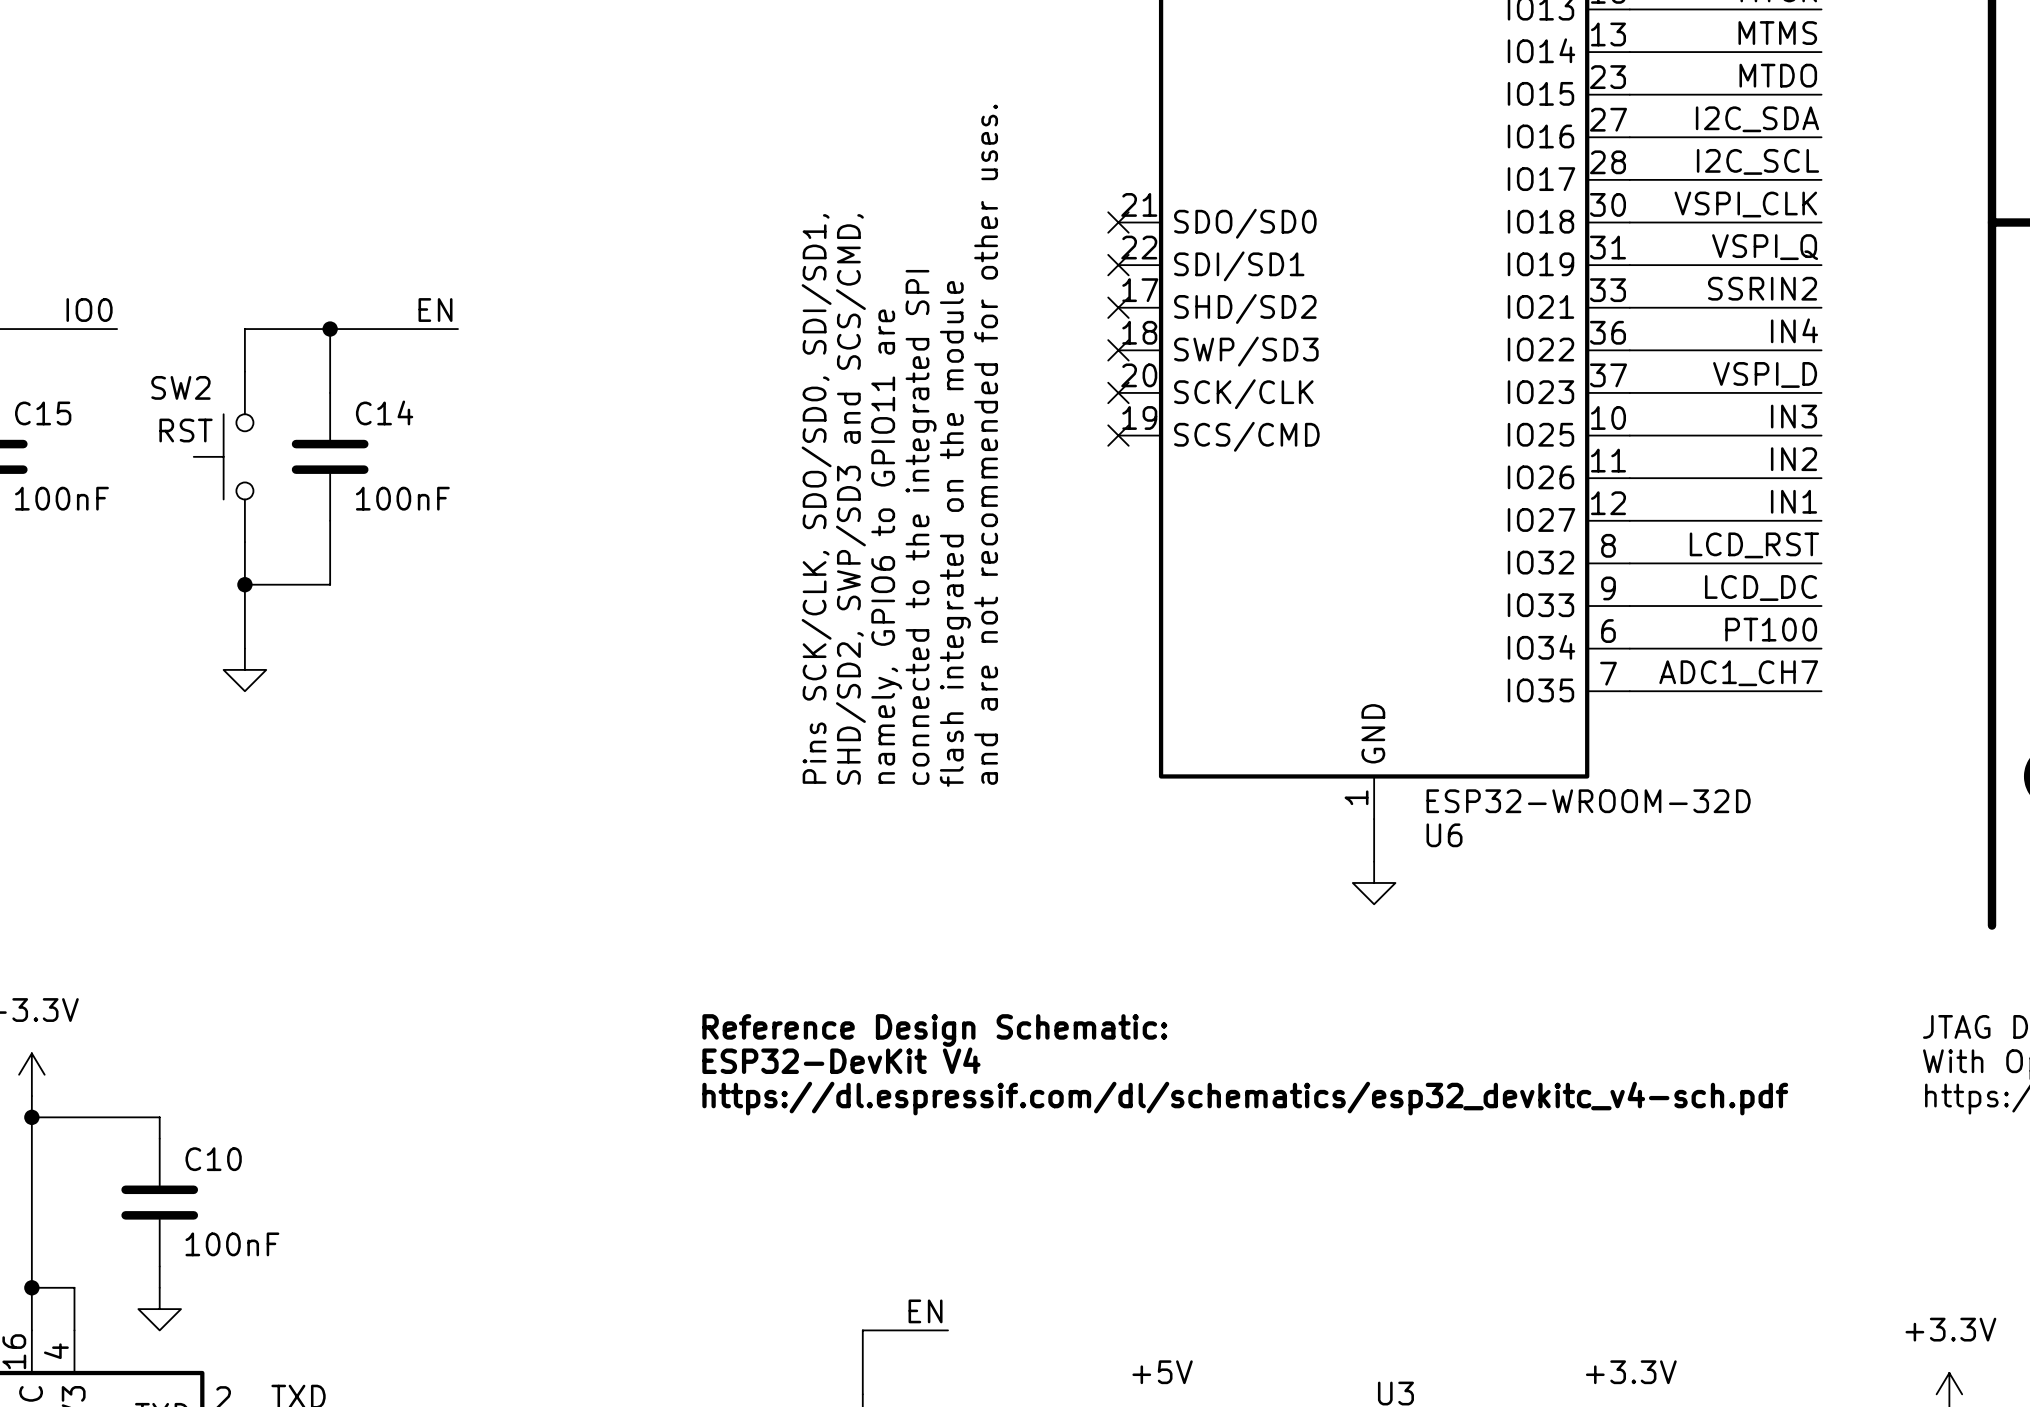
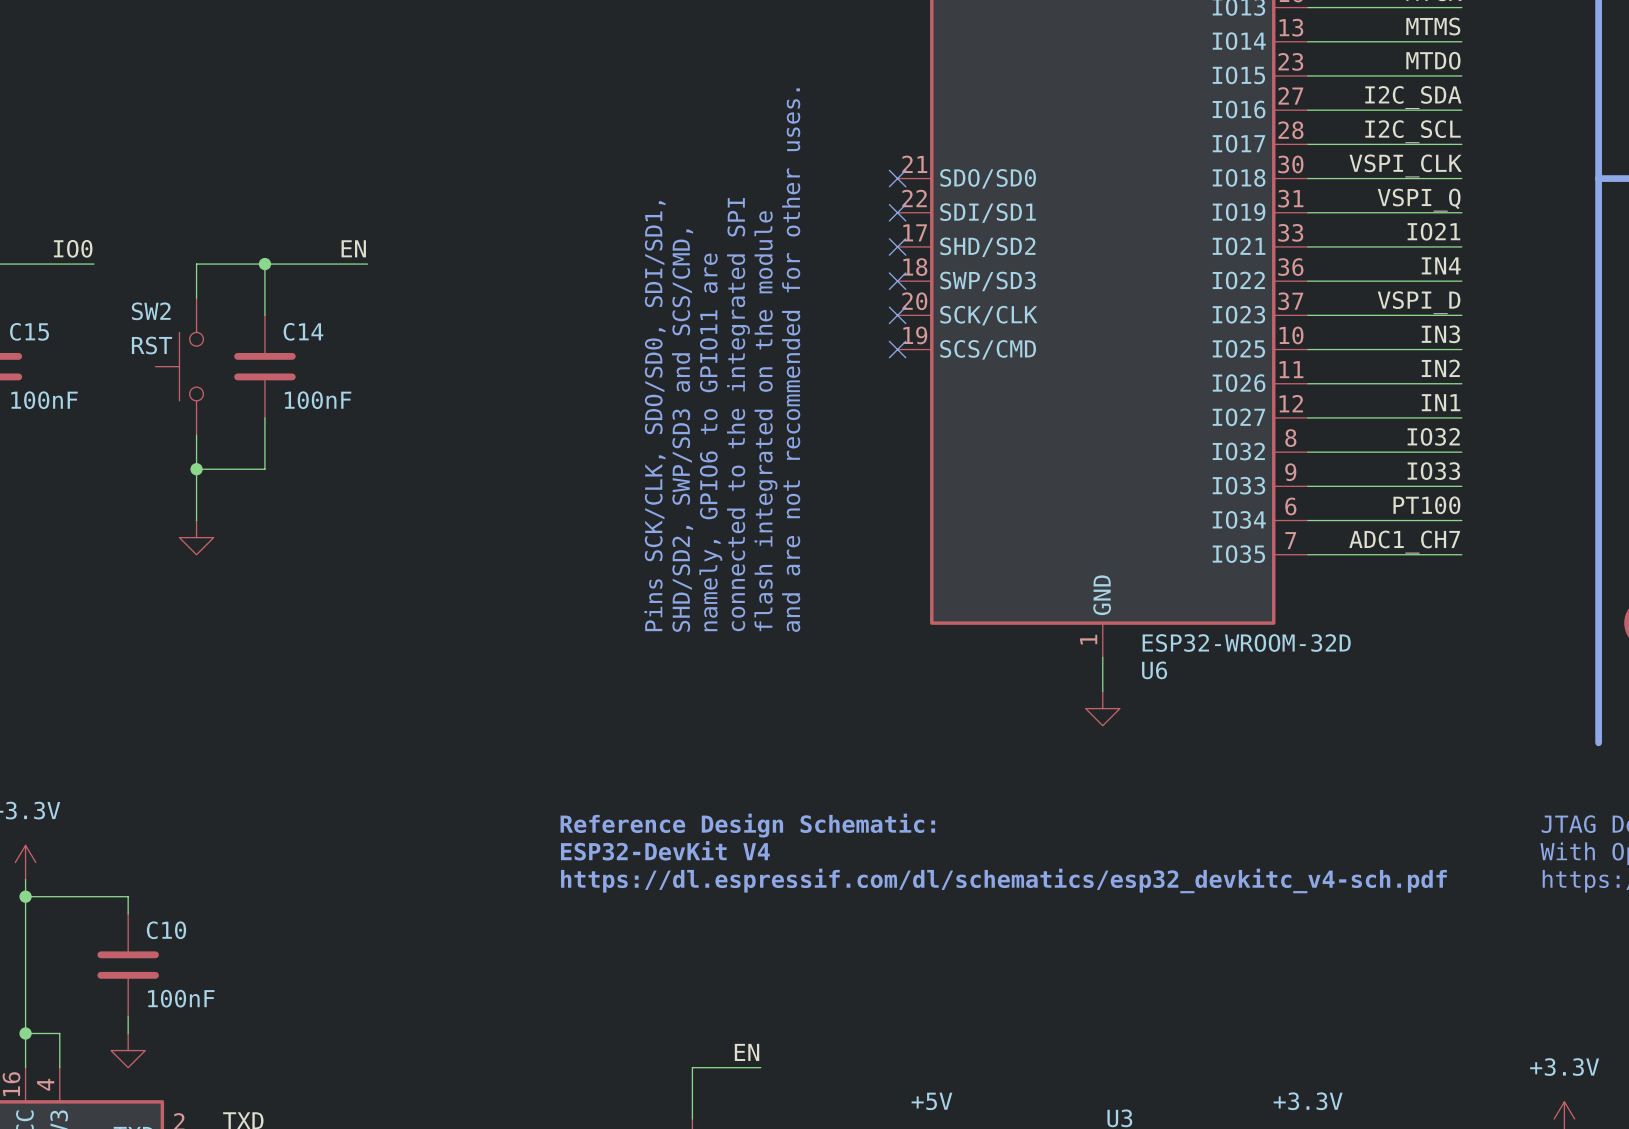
label: SSRIN2 (1762, 288) -> IO21 (1433, 231)
label: LCD_RST (1754, 545) -> IO32 (1433, 436)
label: LCD_DC (1761, 588) -> IO33 (1433, 471)

